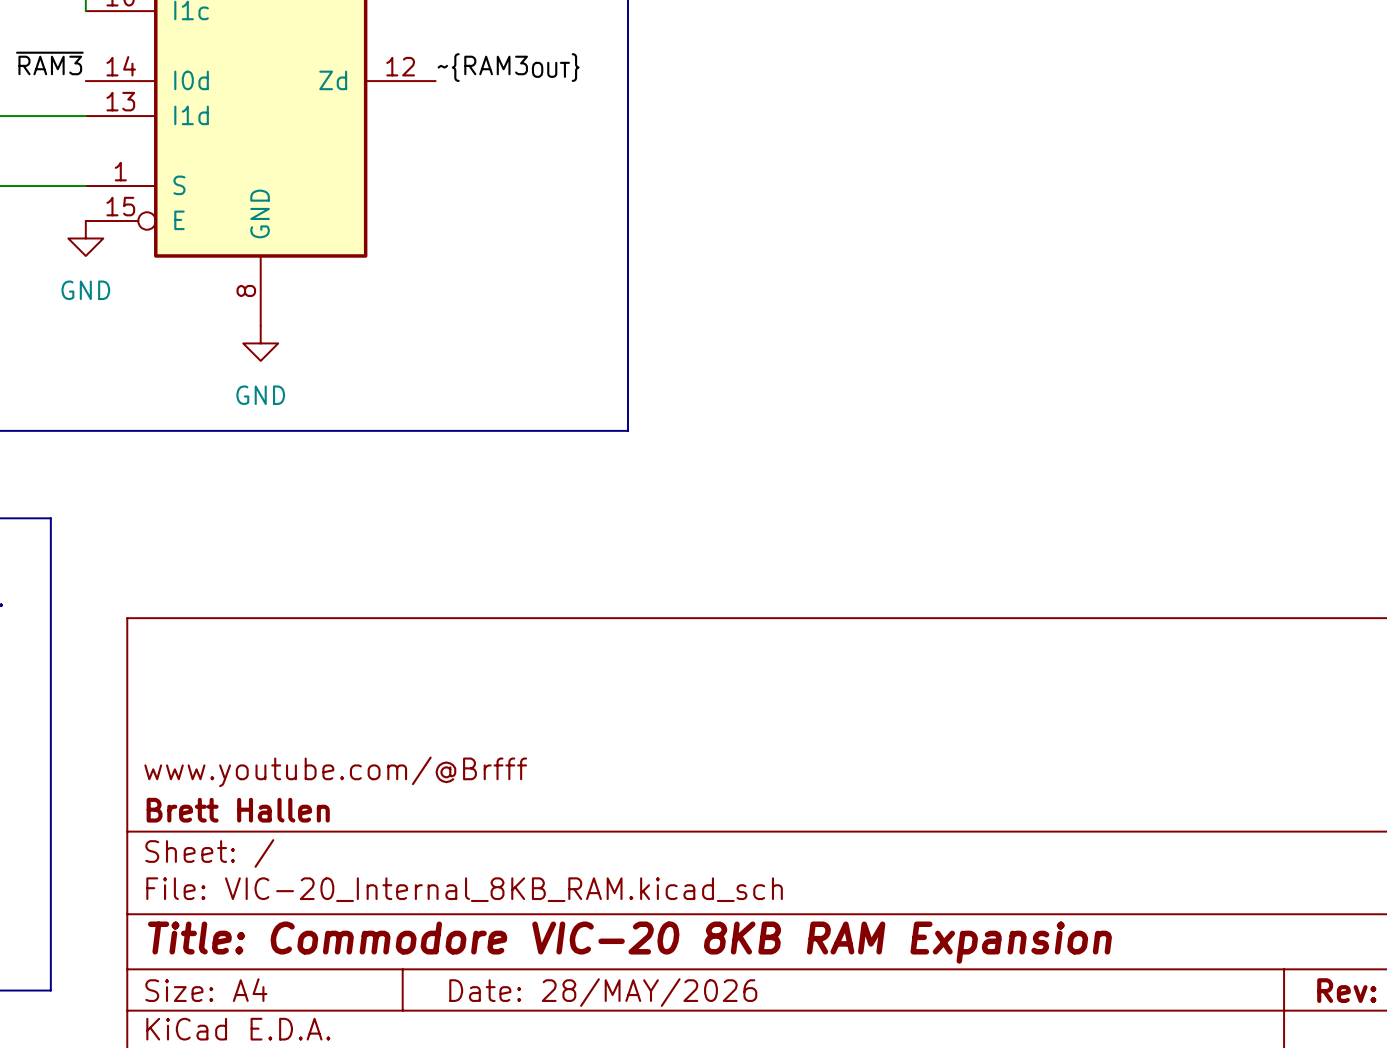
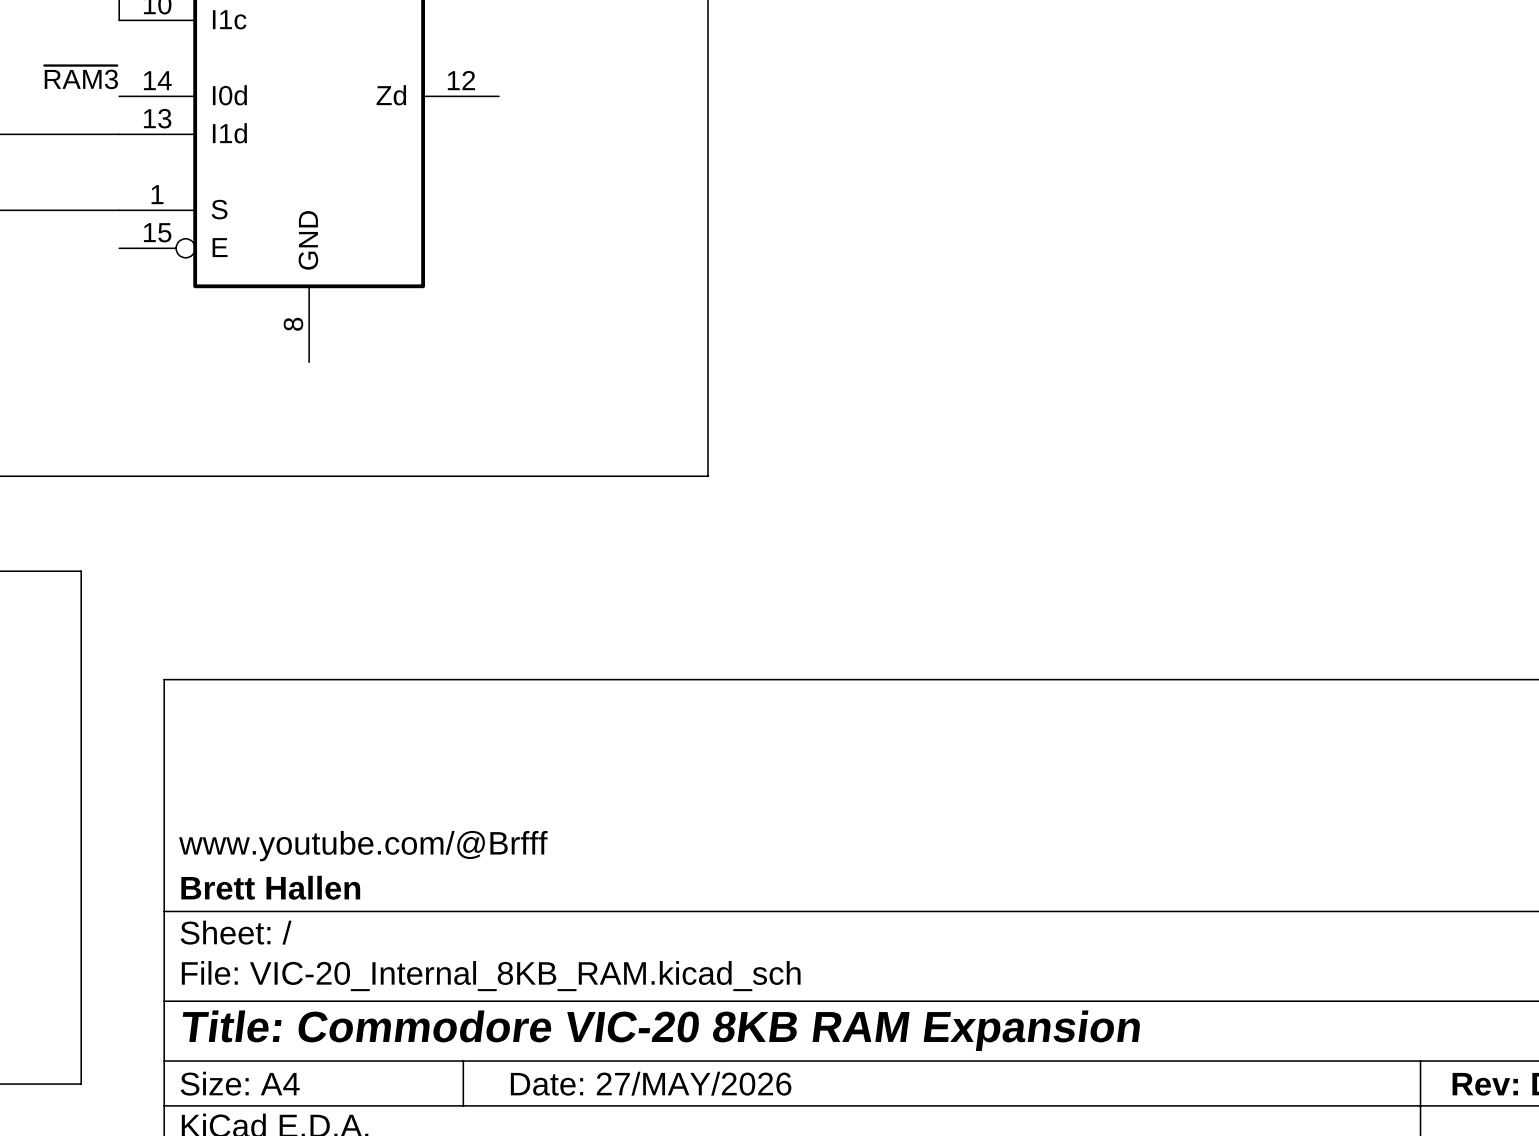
label: ~{RAM3OUT} (508, 67) -> none
power symbol: GND (85, 238) -> none
power symbol: GND (260, 343) -> none
title block: Date: 28/MAY/2026 (603, 992) -> Date: 27/MAY/2026 (651, 1083)

